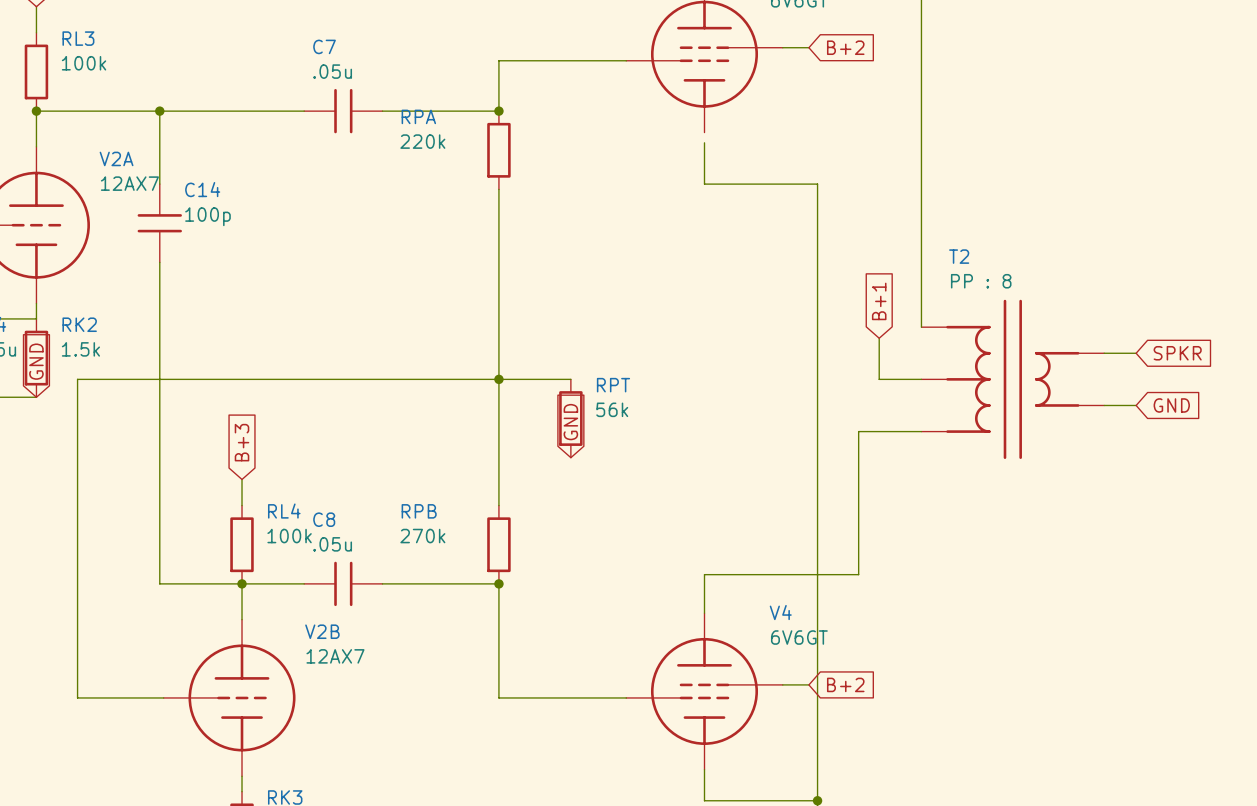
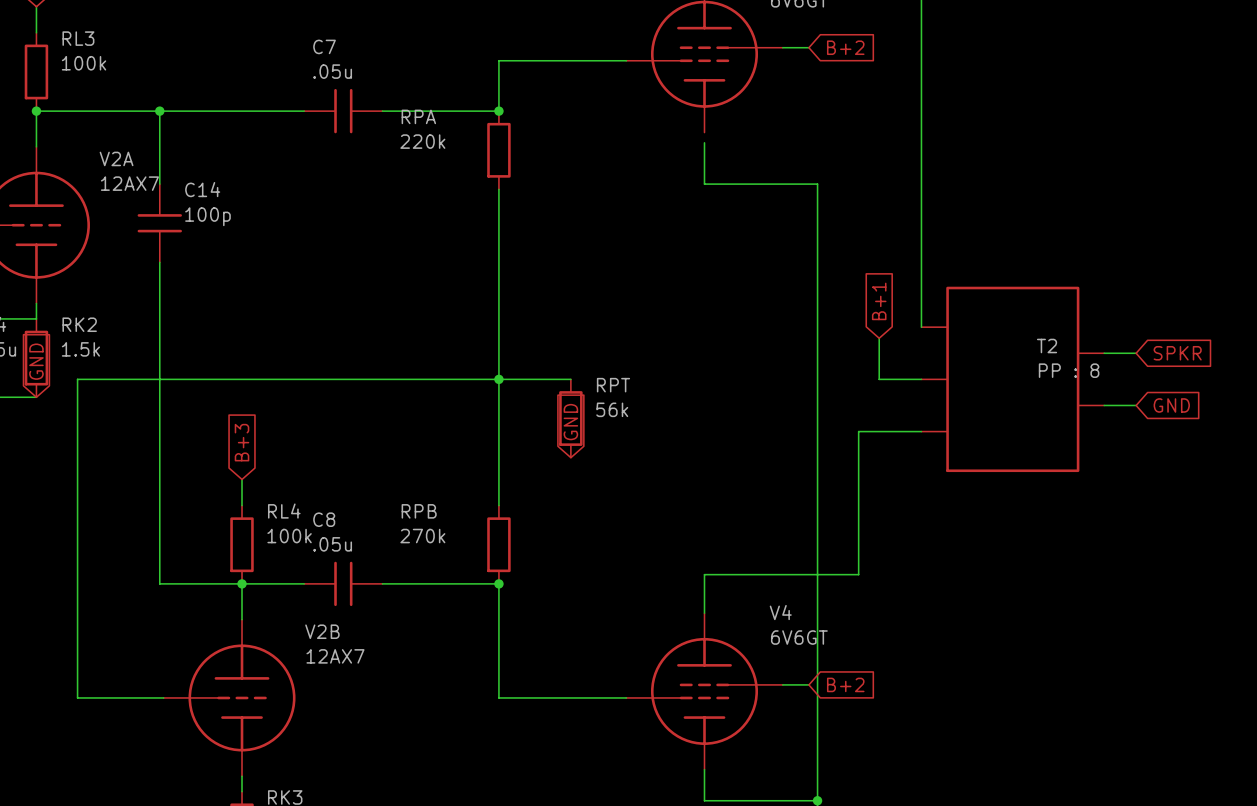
T2 name position: T2 (959, 256) -> T2 (1047, 346)
T2 value position: PP : 8 (981, 281) -> PP : 8 (1069, 370)
T2 symbol: [921, 299, 1105, 459] -> [921, 286, 1105, 473]

